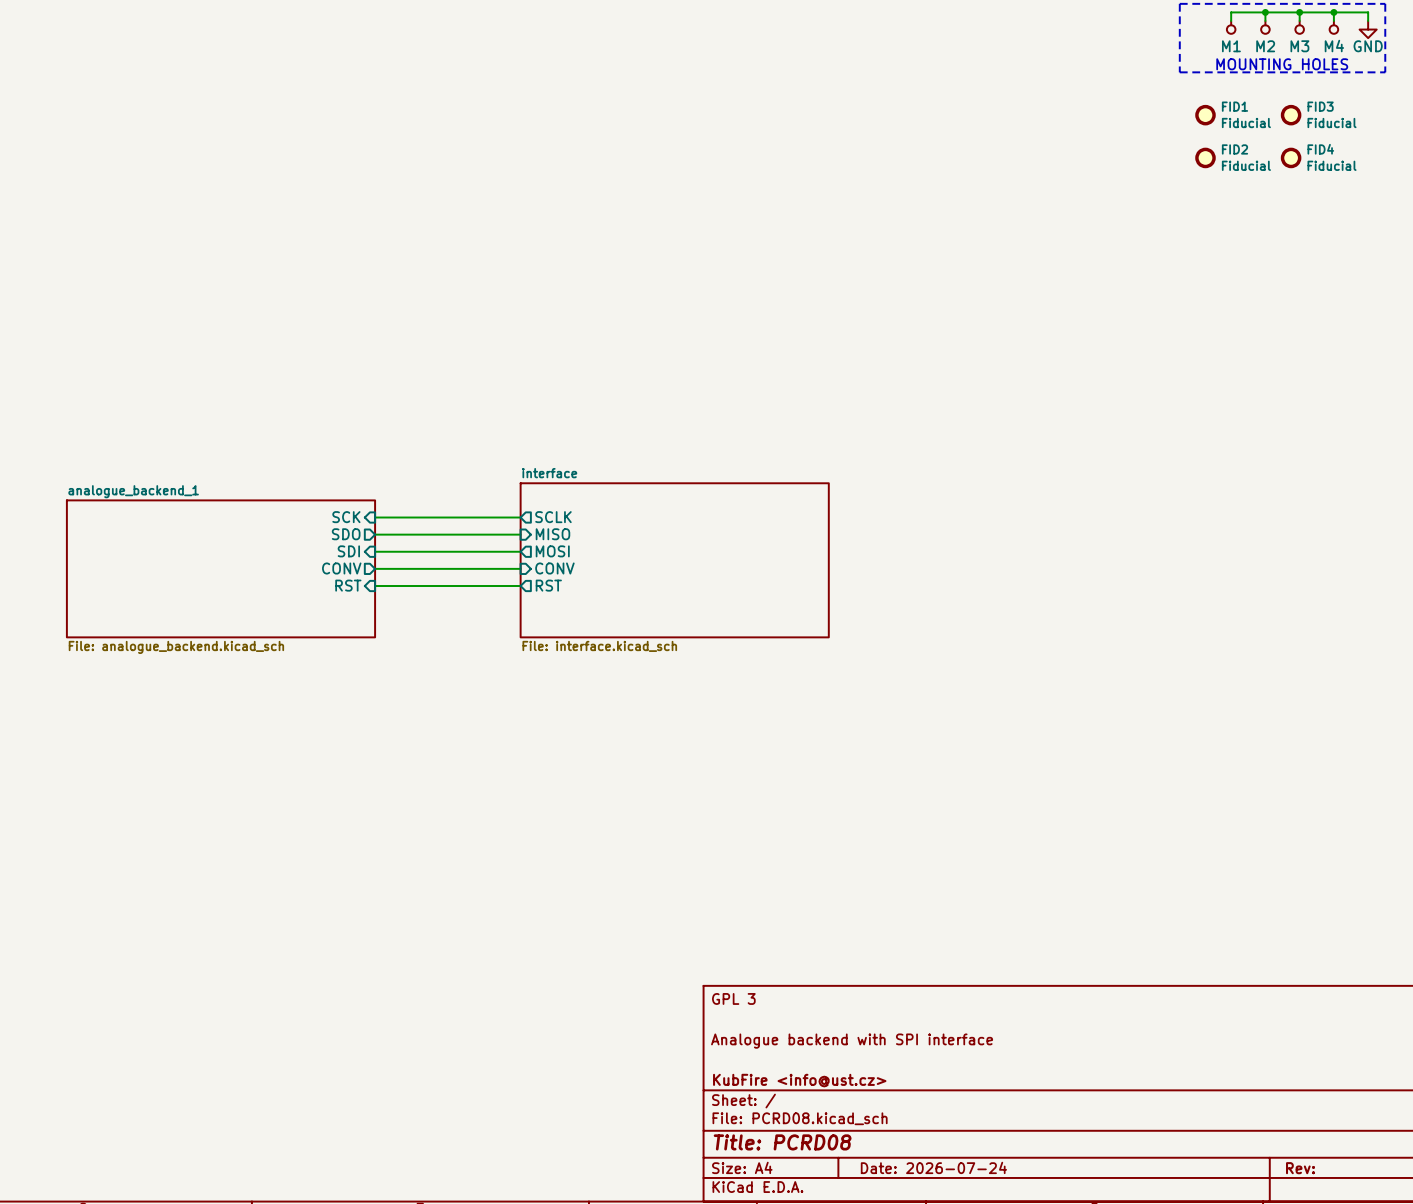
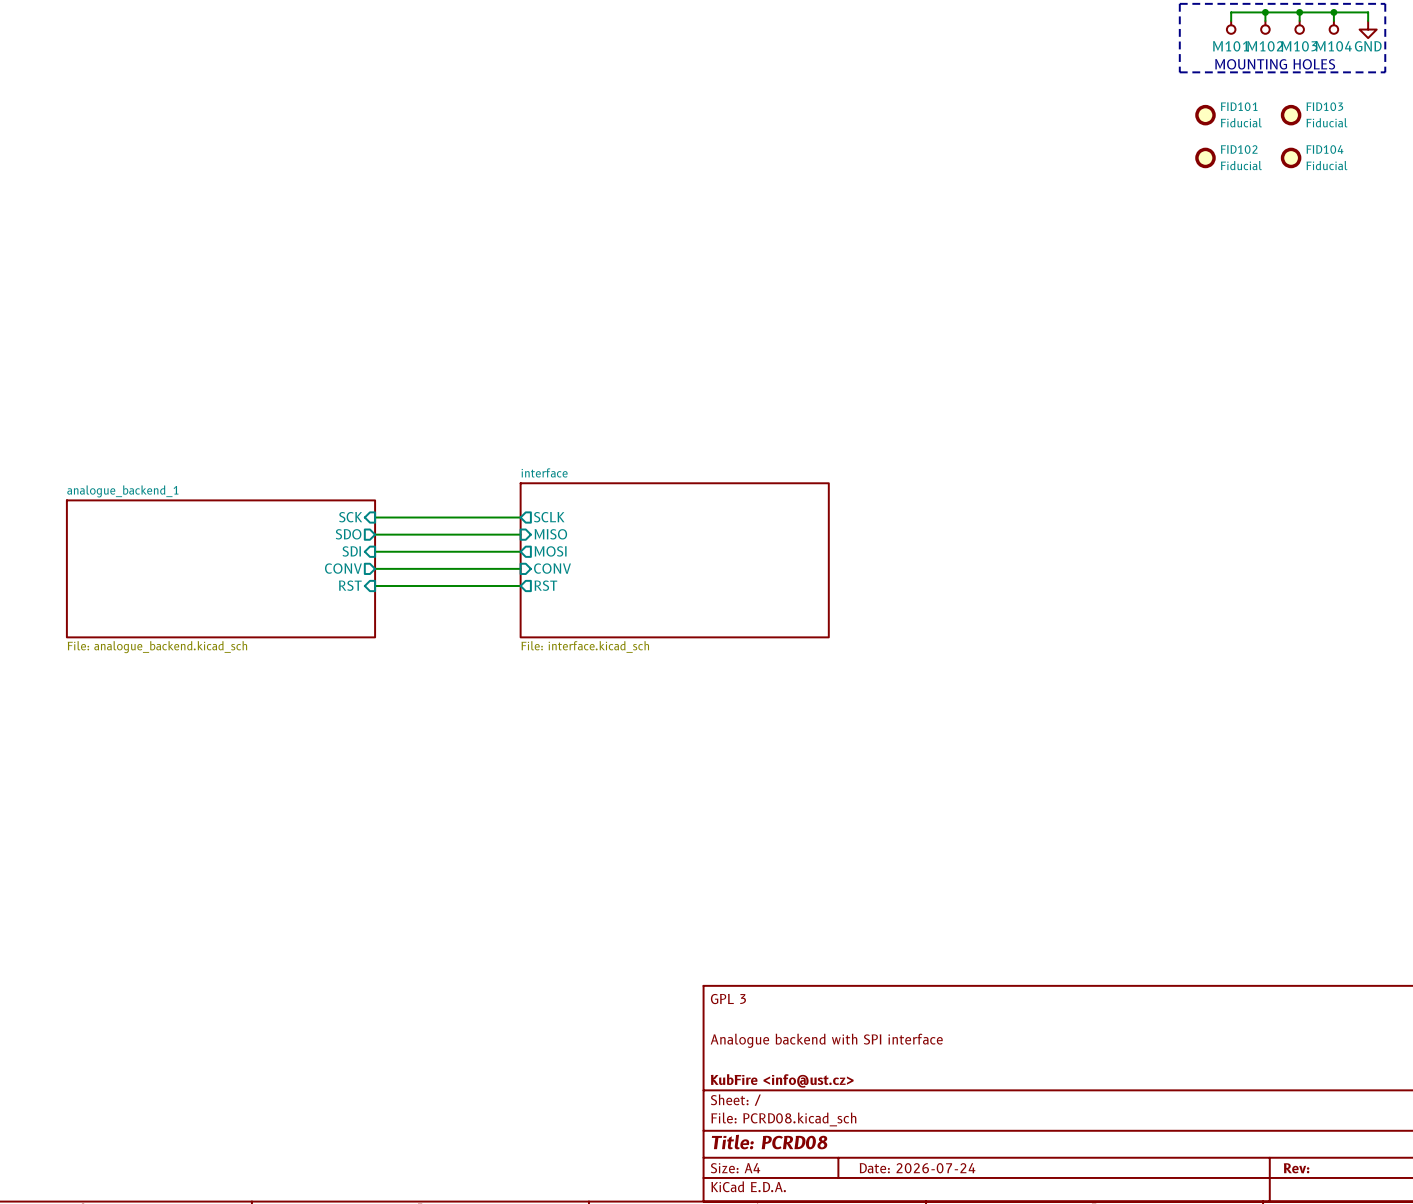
M1 name: M1 (1231, 46) -> M101 (1230, 46)
M2 name: M2 (1265, 46) -> M102 (1265, 46)
M3 name: M3 (1299, 46) -> M103 (1299, 46)
M4 name: M4 (1334, 46) -> M104 (1333, 46)
FID1 name: FID1 (1234, 106) -> FID101 (1239, 106)
FID3 name: FID3 (1320, 106) -> FID103 (1324, 106)
FID2 name: FID2 (1234, 149) -> FID102 (1239, 149)
FID4 name: FID4 (1320, 149) -> FID104 (1324, 149)

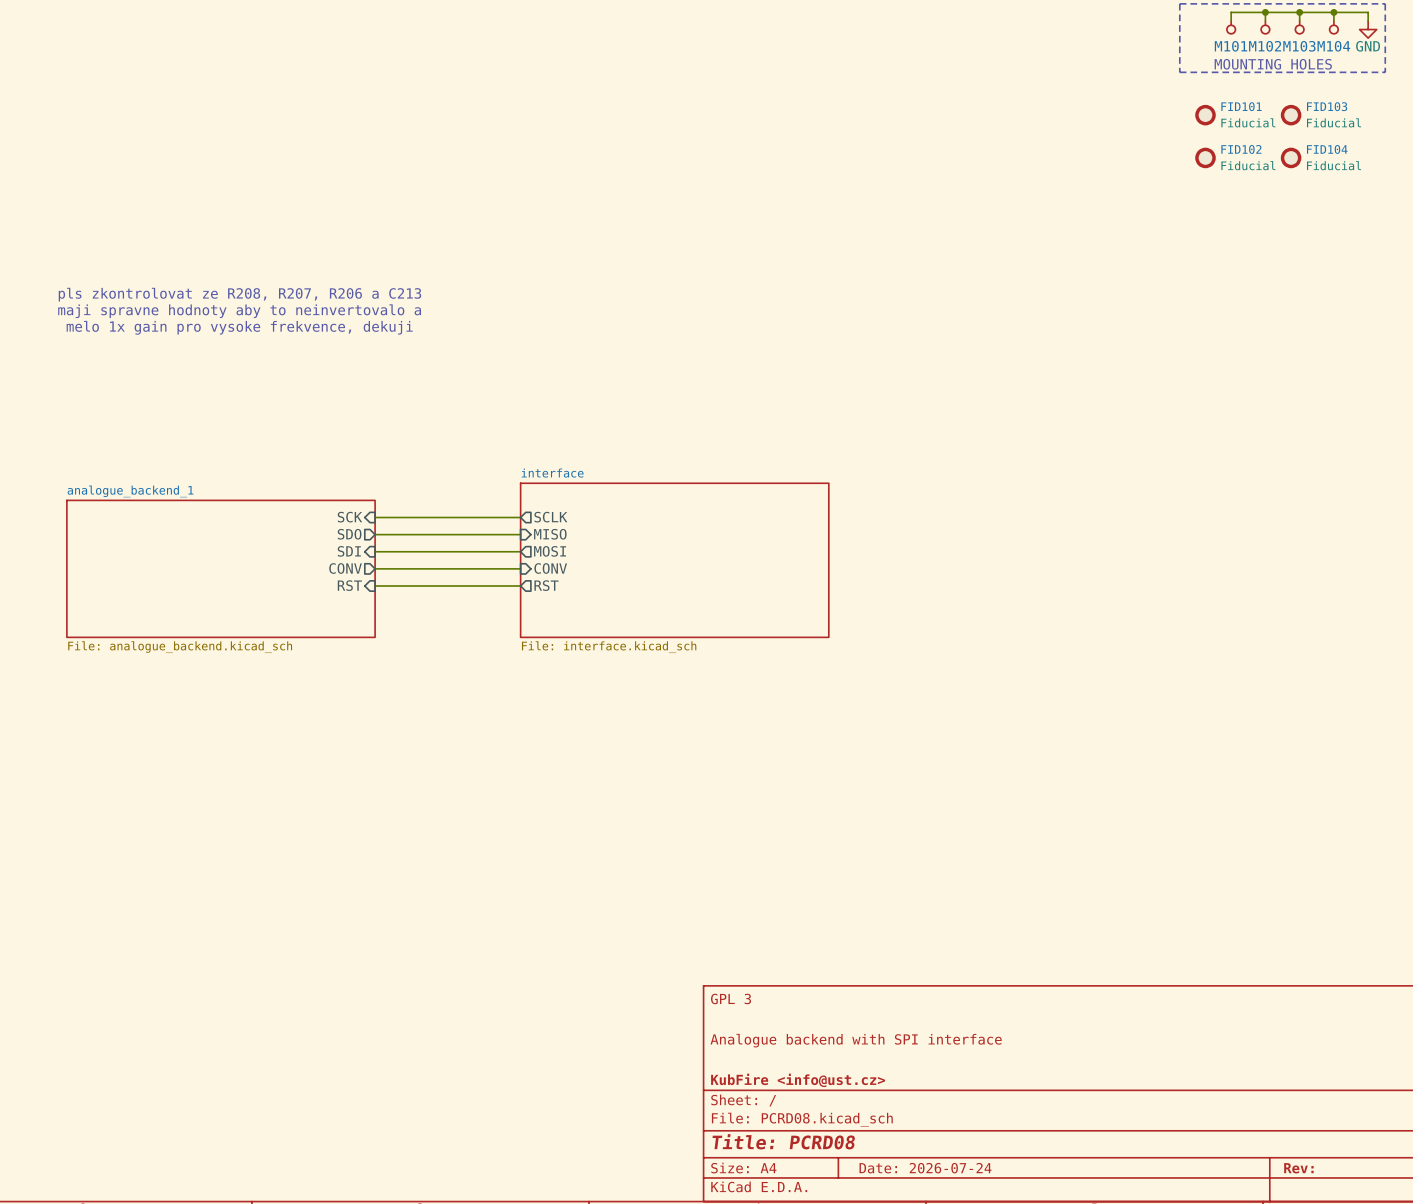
text: none -> pls zkontrolovat ze R208, R207, R206 a C213 (239, 294)
text: none -> maji spravne hodnoty aby to neinvertovalo a (239, 311)
text: none -> melo 1x gain pro vysoke frekvence, dekuji (239, 327)

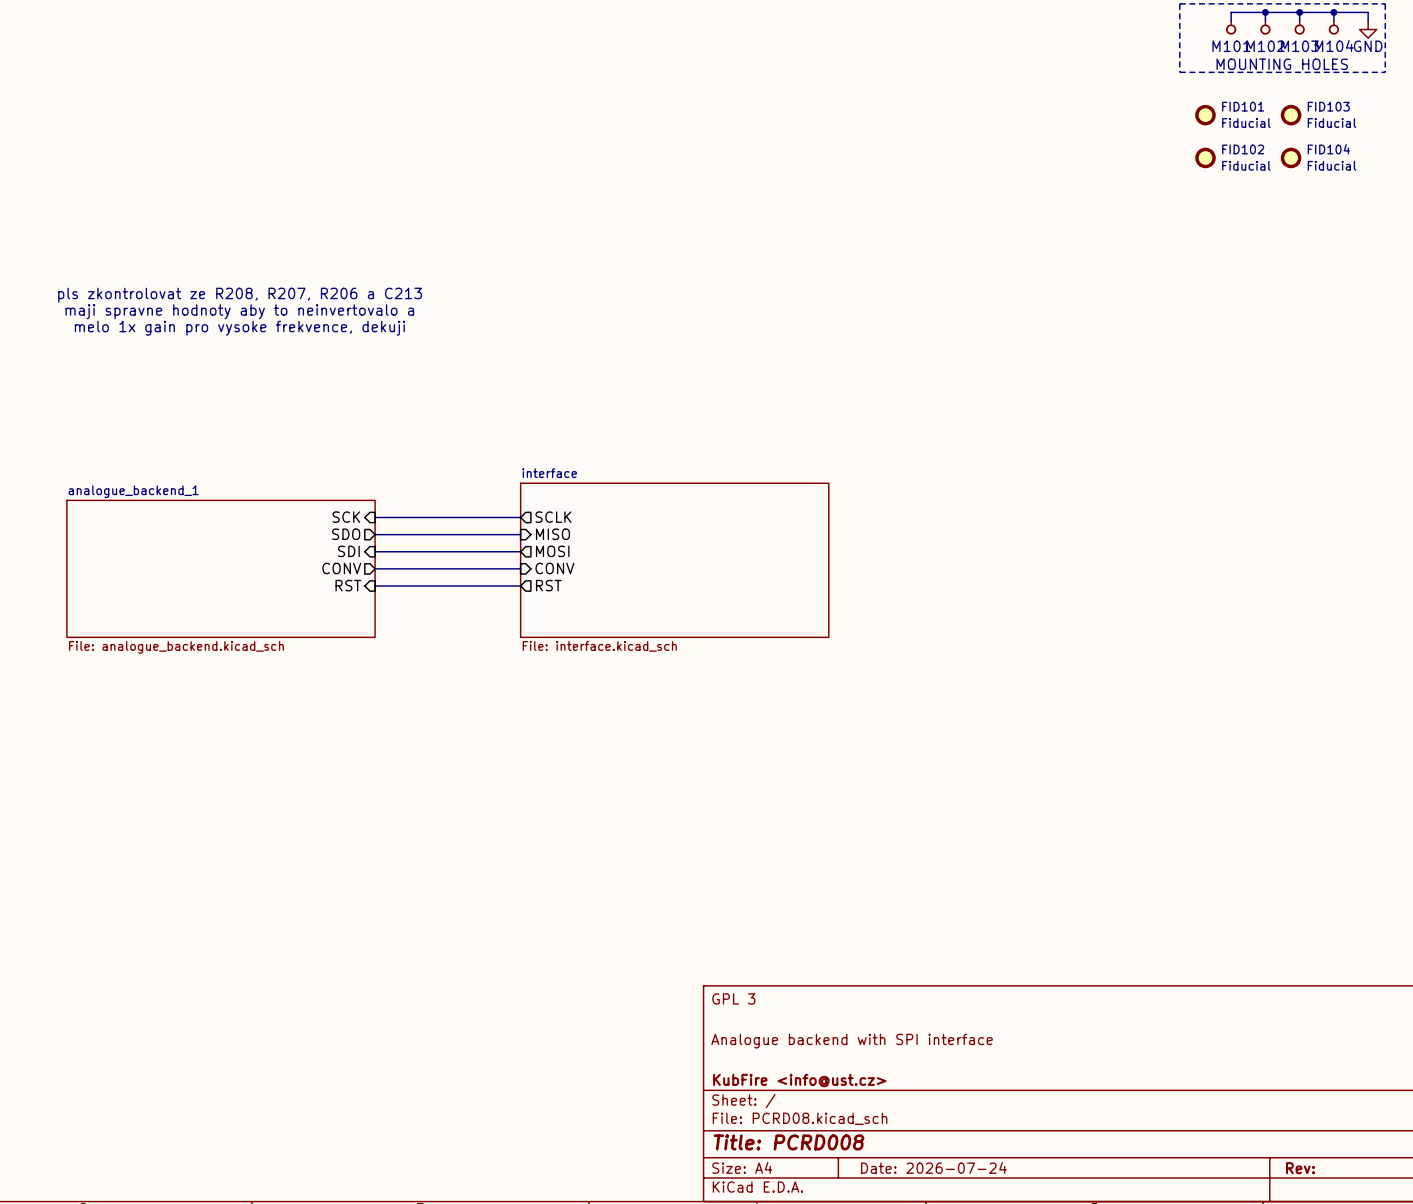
title block: Title: PCRD08 (783, 1141) -> Title: PCRD008 (789, 1142)

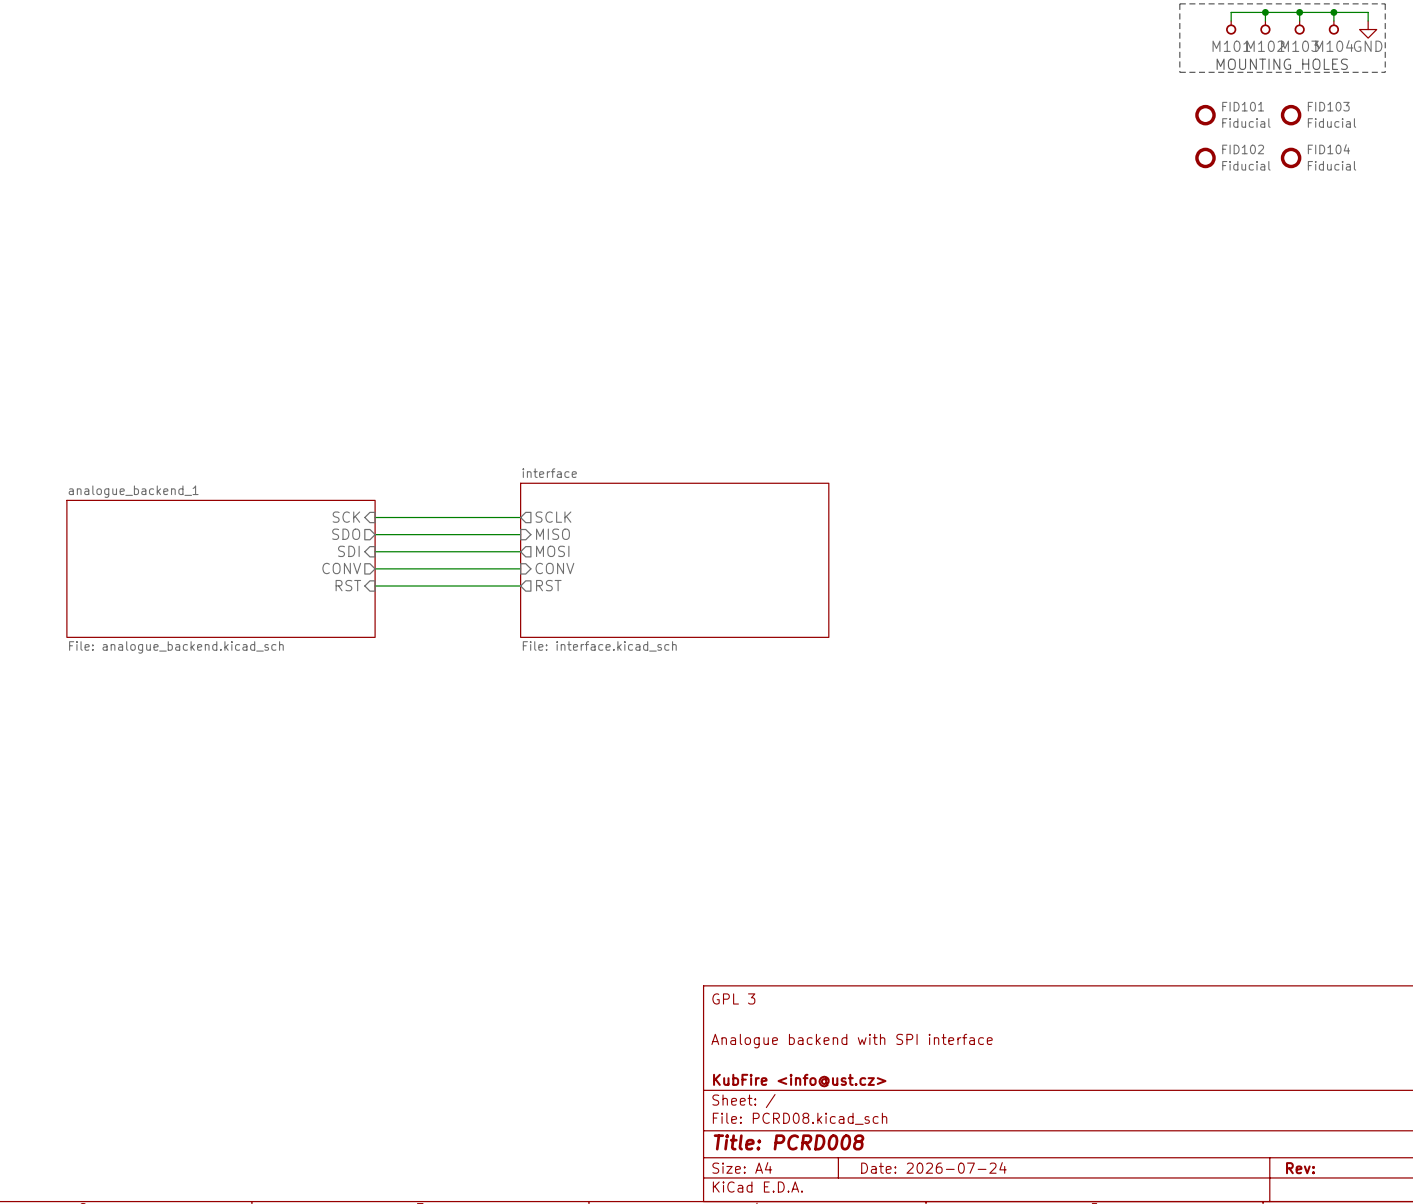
text: pls zkontrolovat ze R208, R207, R206 a C213 (240, 295) -> none
text: maji spravne hodnoty aby to neinvertovalo a (239, 311) -> none
text: melo 1x gain pro vysoke frekvence, dekuji (240, 328) -> none

